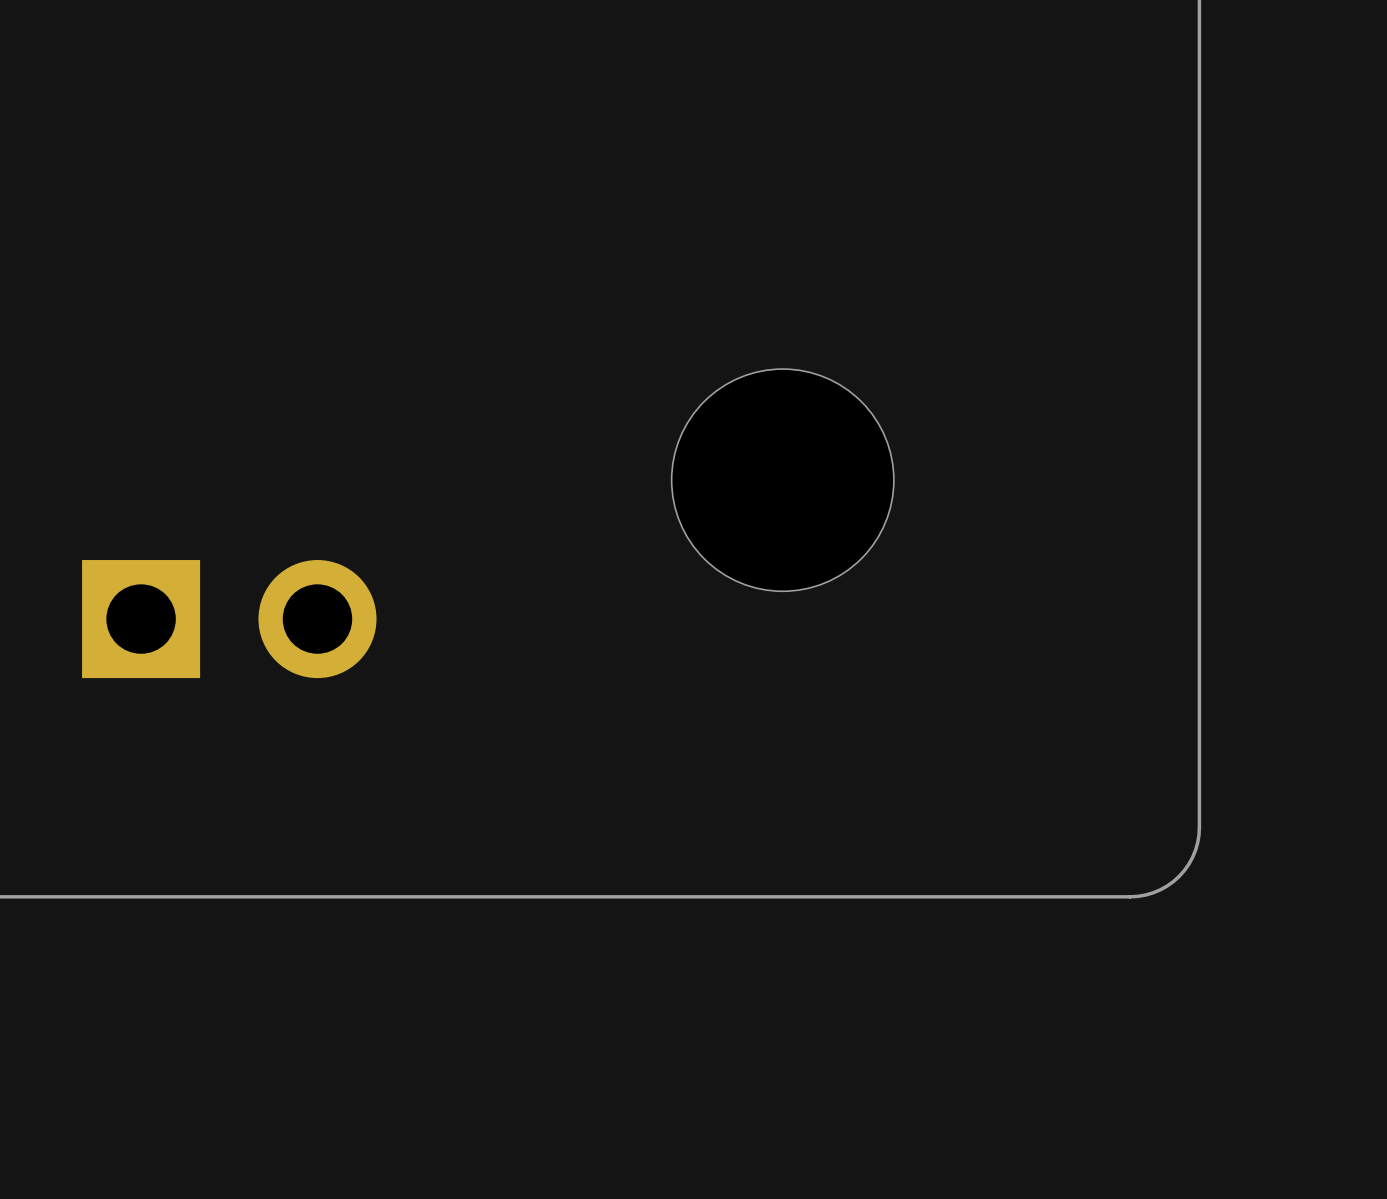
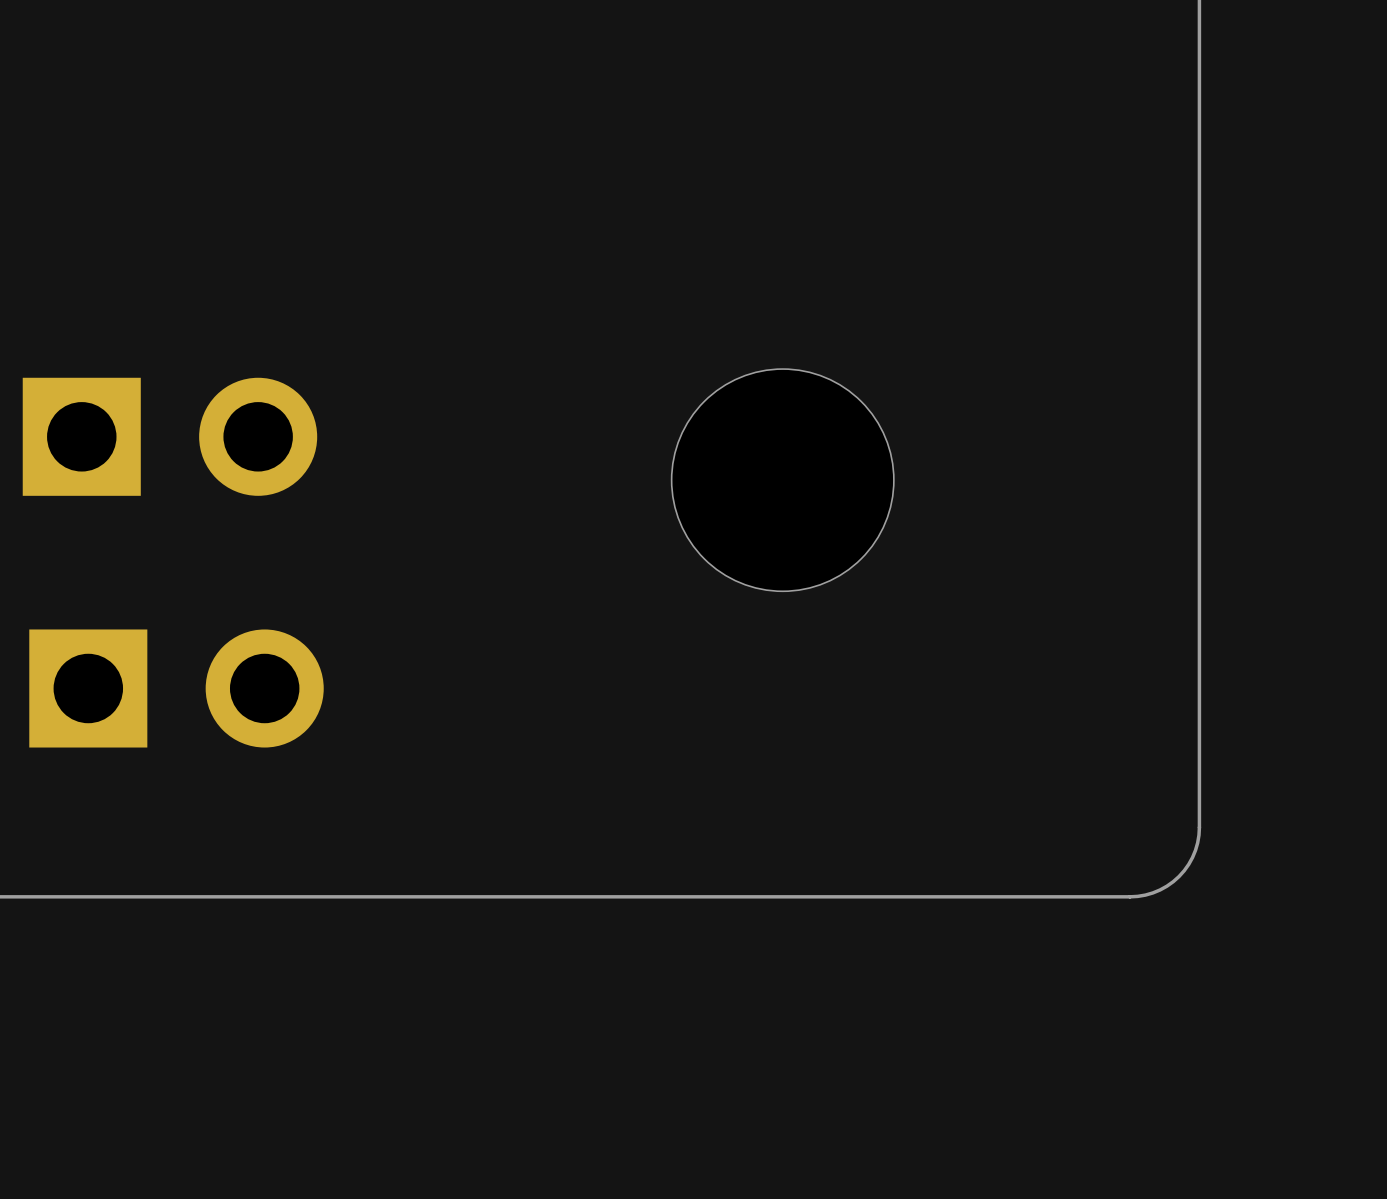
part: none -> (169, 436)
part position: (229, 619) -> (176, 688)

